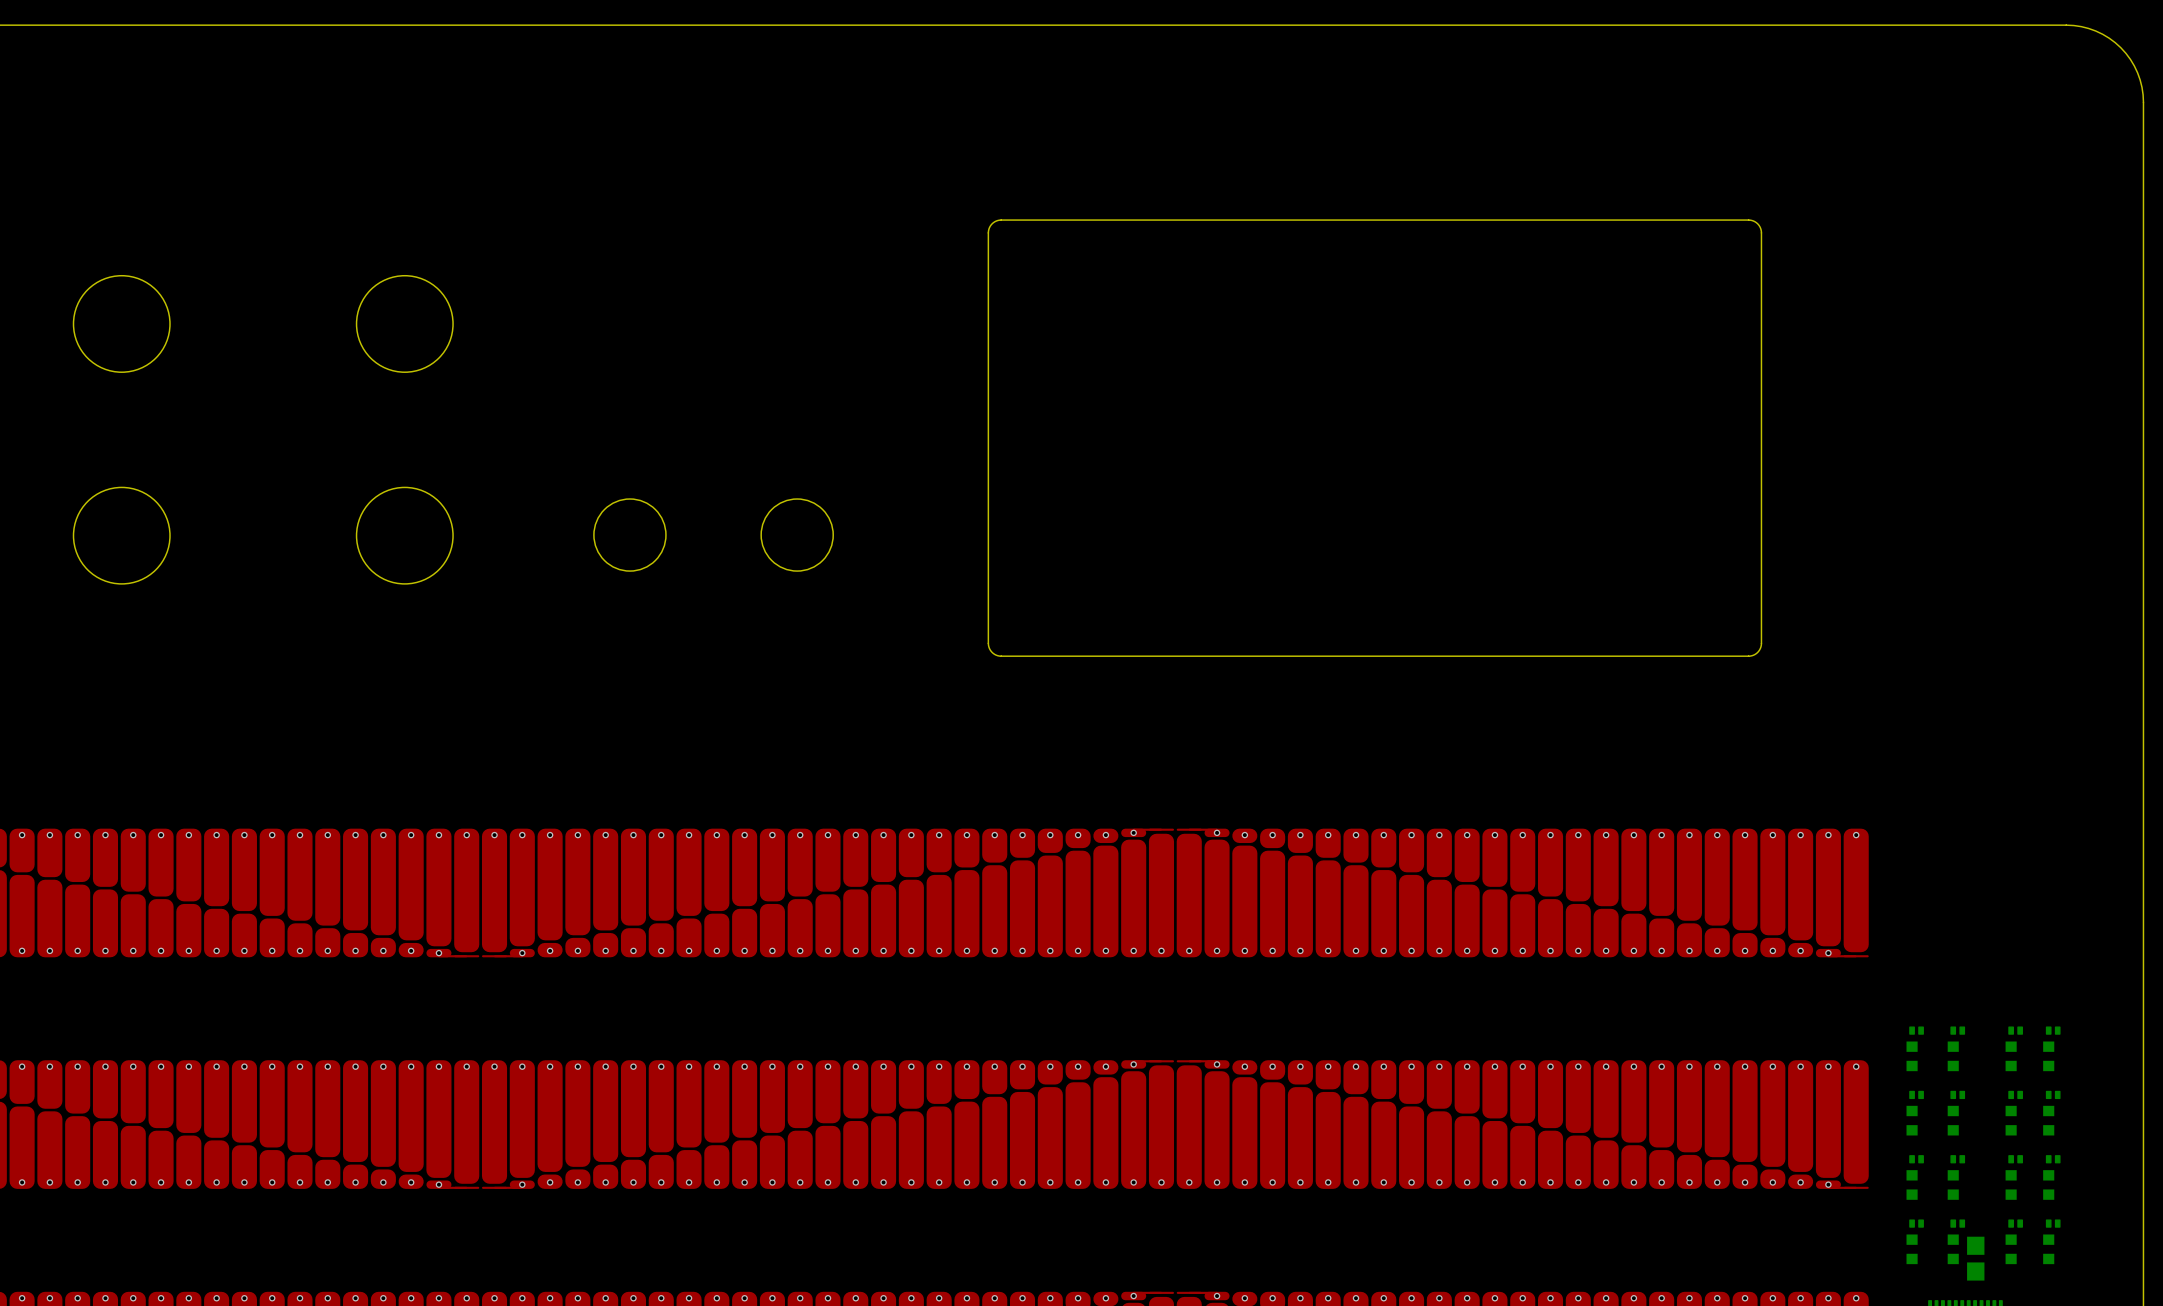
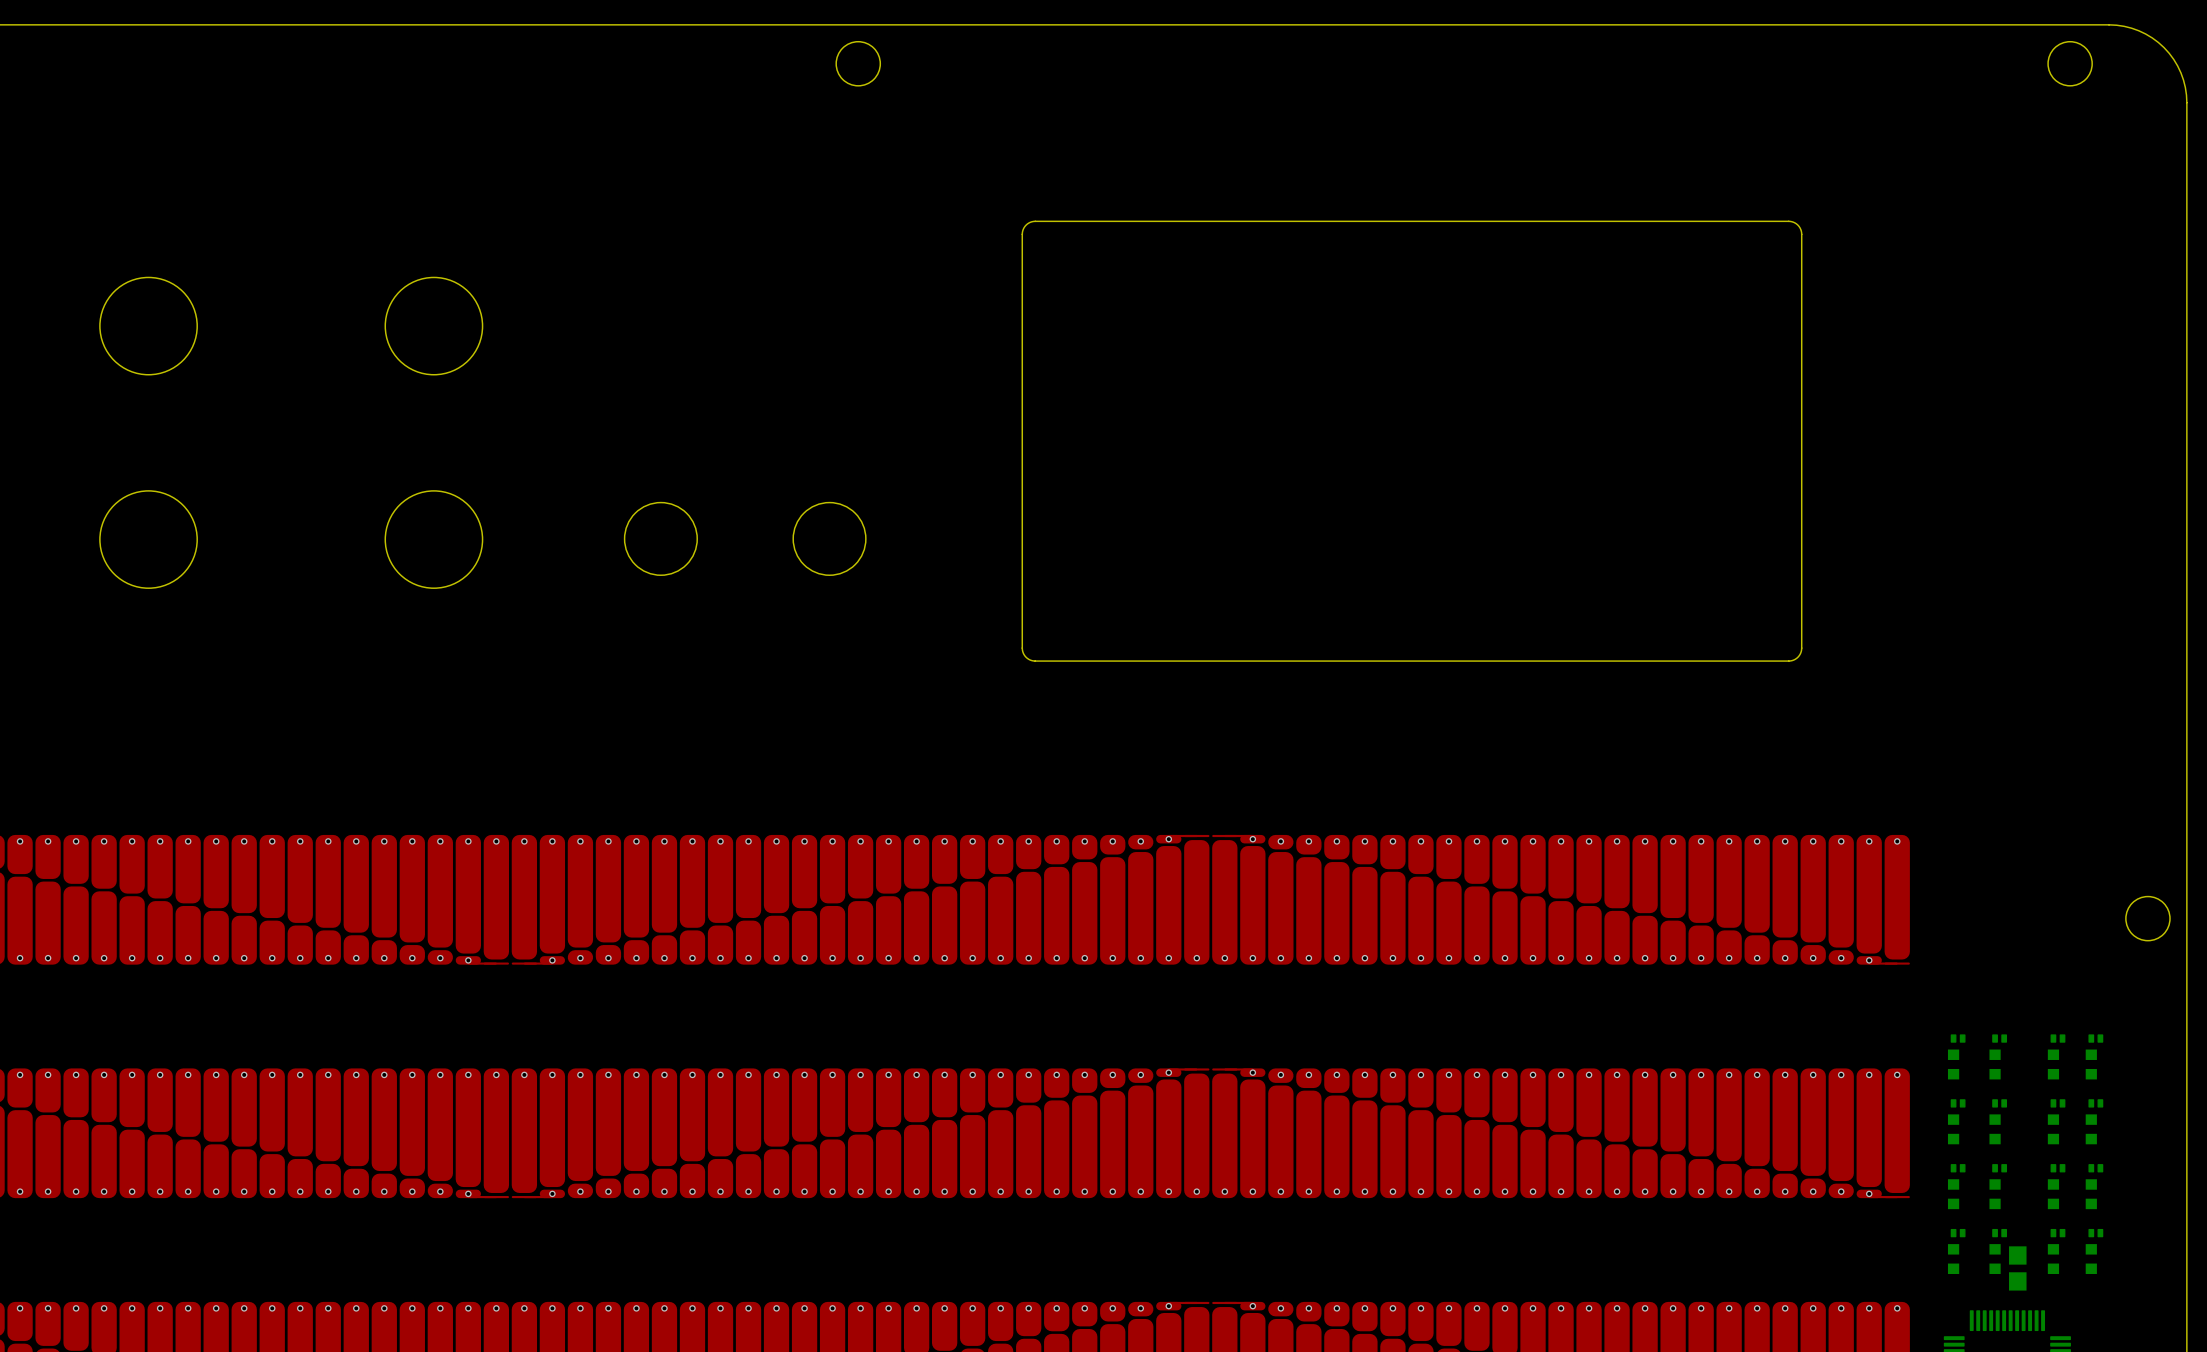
round board edge: none -> [835, 41, 881, 87]
round board edge: none -> [2047, 41, 2093, 87]
round board edge: none -> [2125, 895, 2171, 942]

